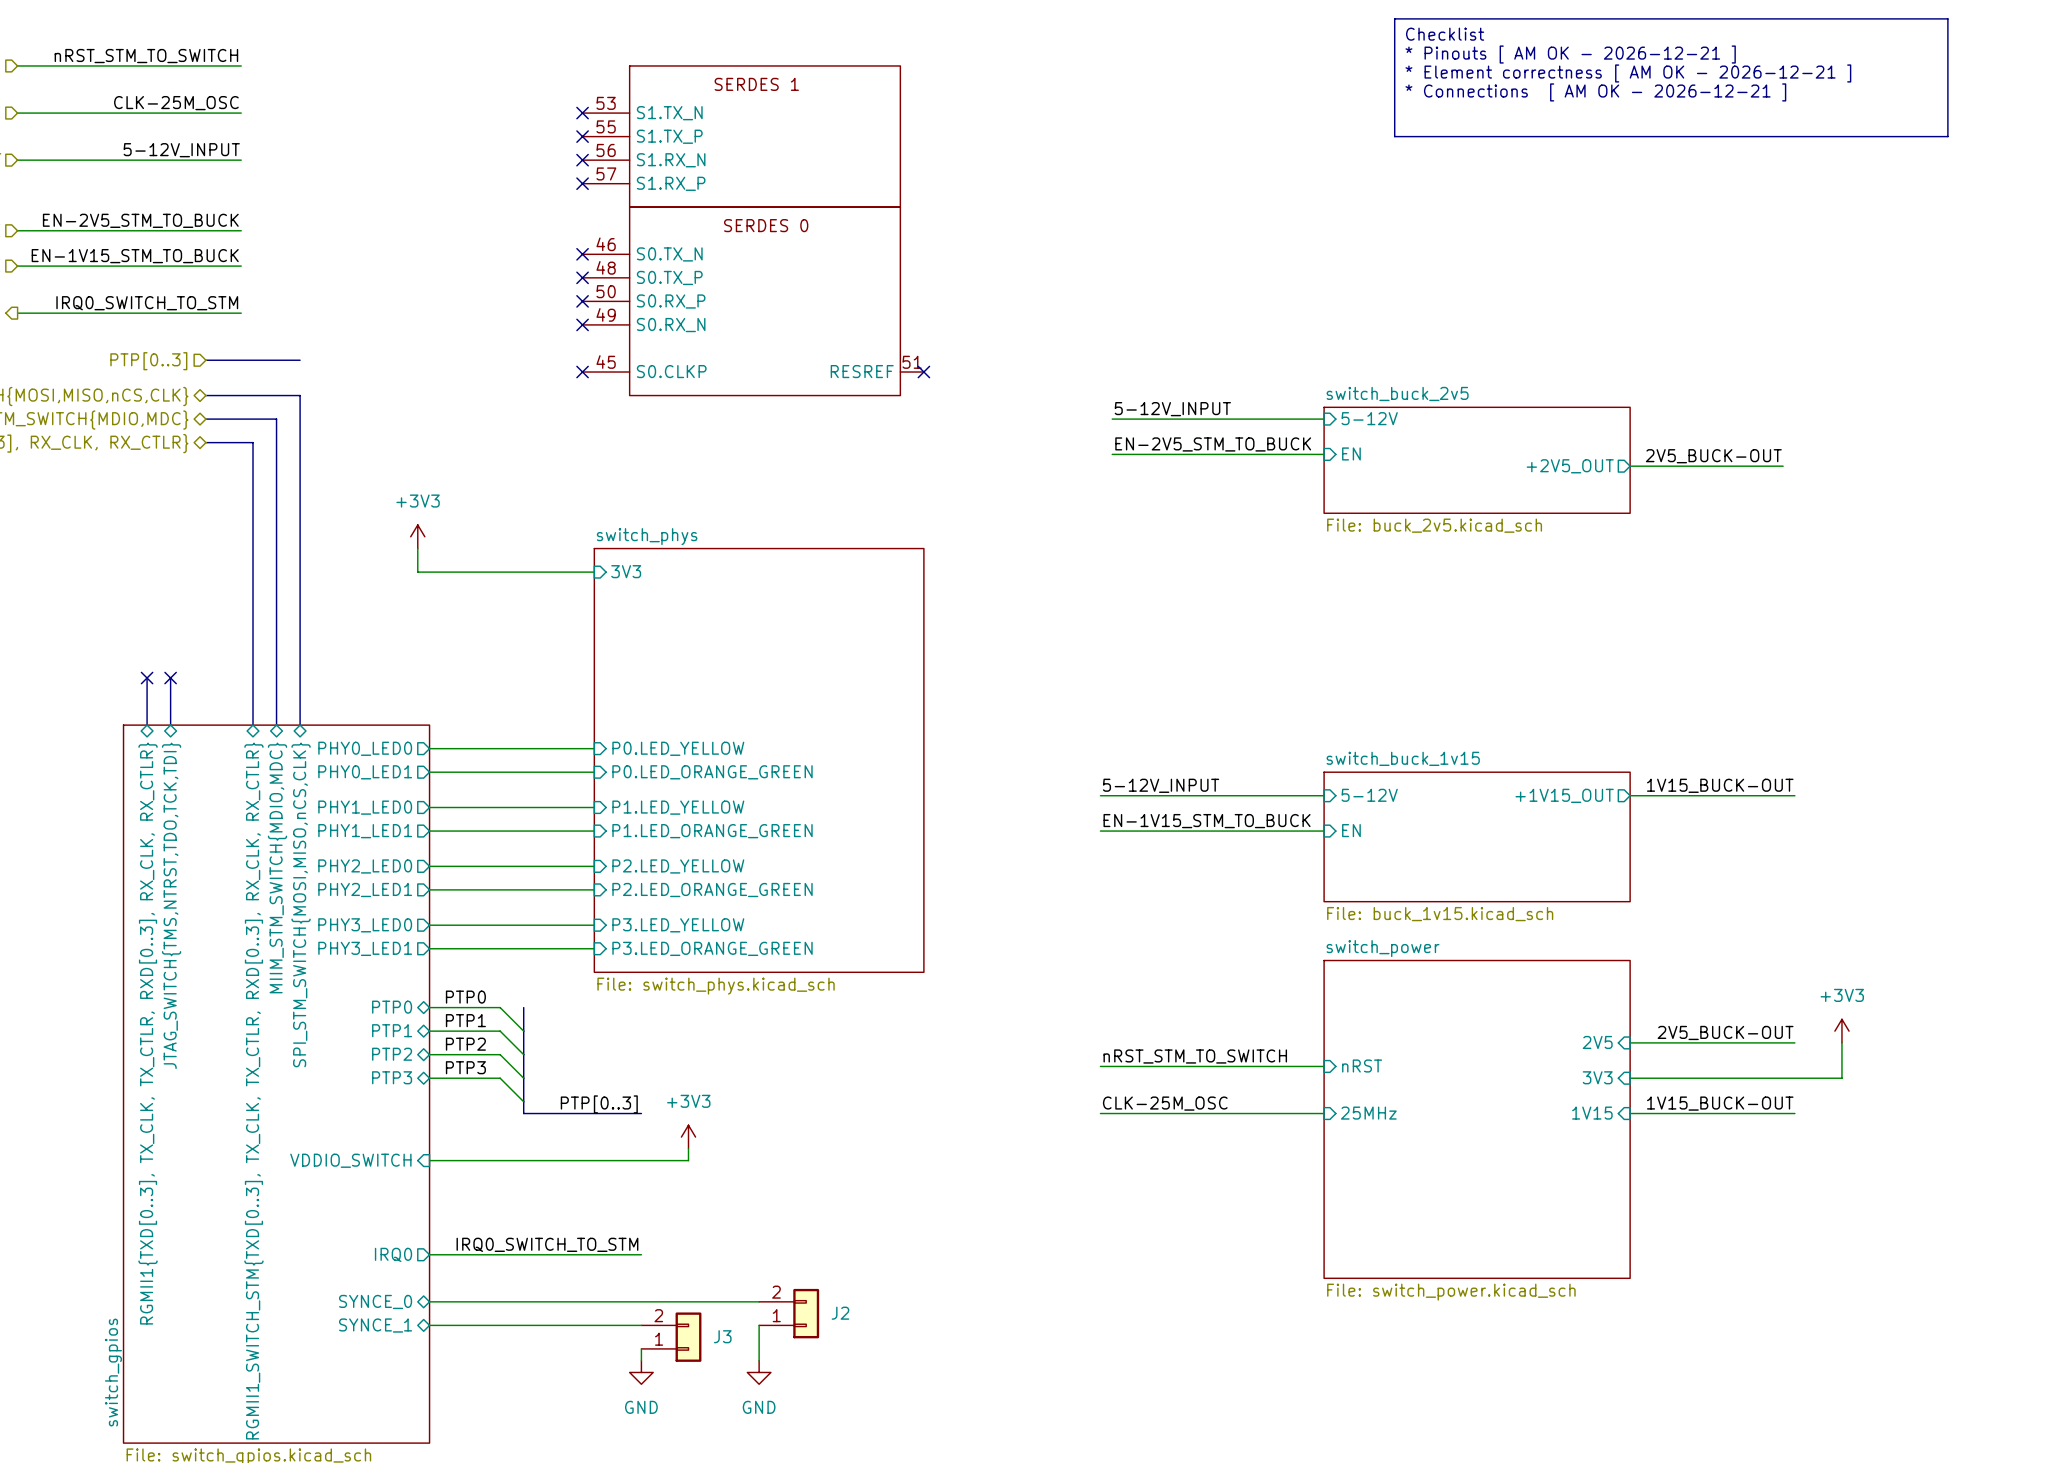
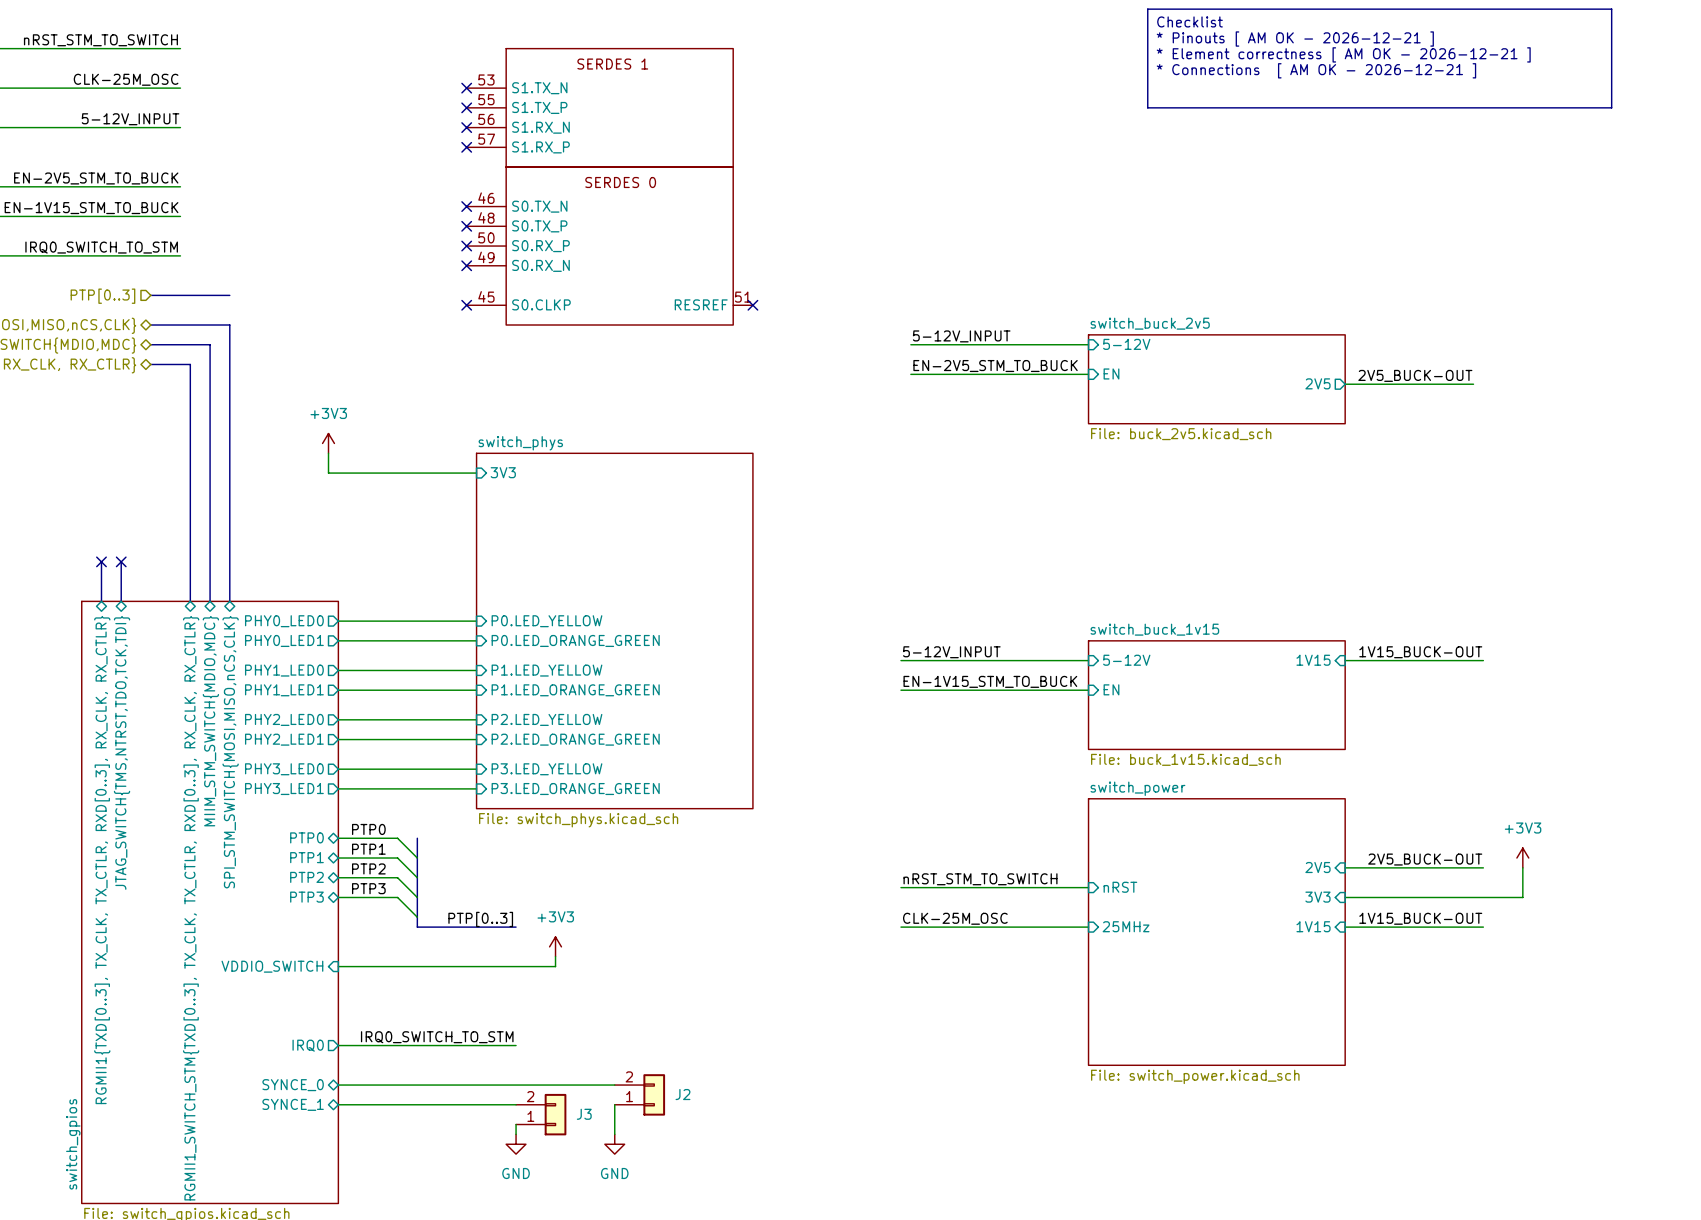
sheet pin: +2V5_OUT (1570, 466) -> 2V5 (1317, 383)
sheet pin shape: output (1564, 795) -> input (1313, 660)
sheet pin: +1V15_OUT (1564, 795) -> 1V15 (1313, 660)

